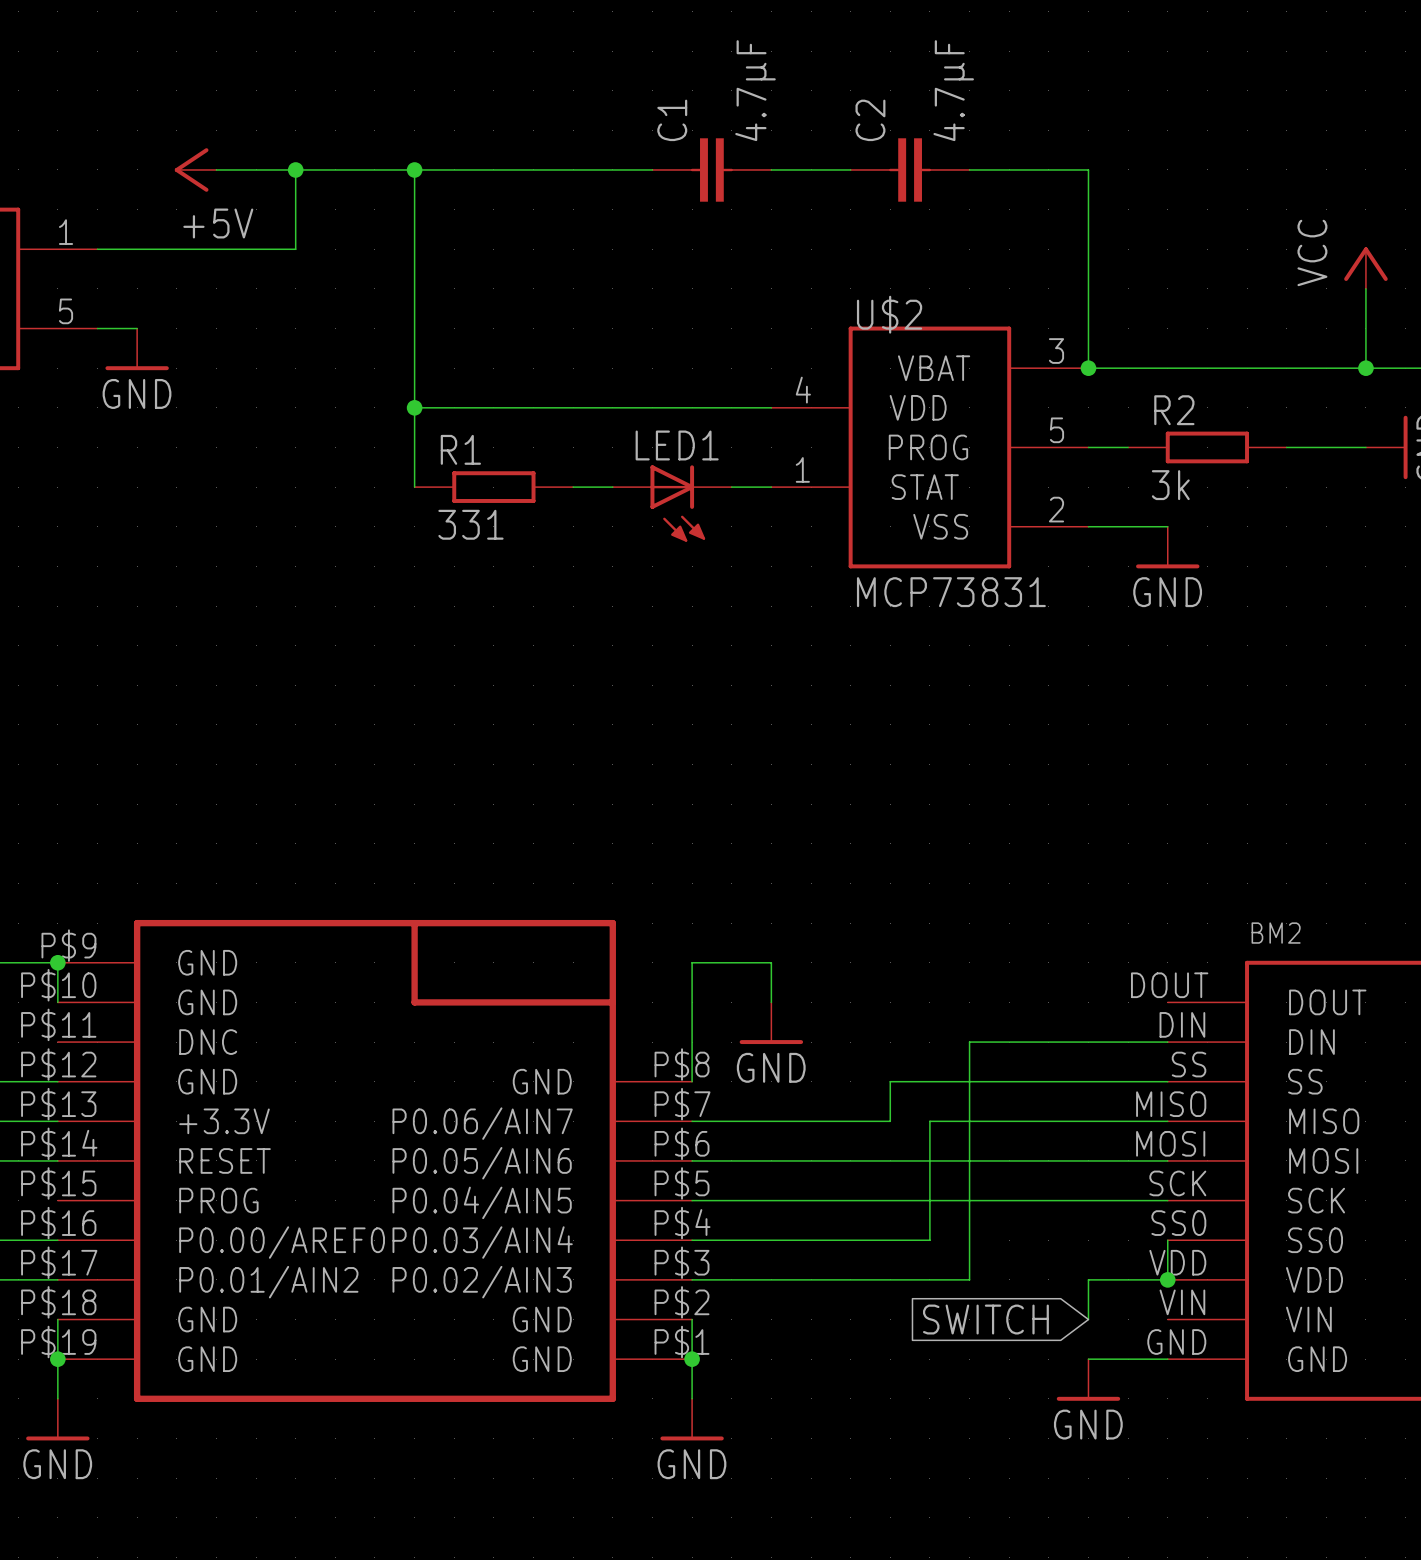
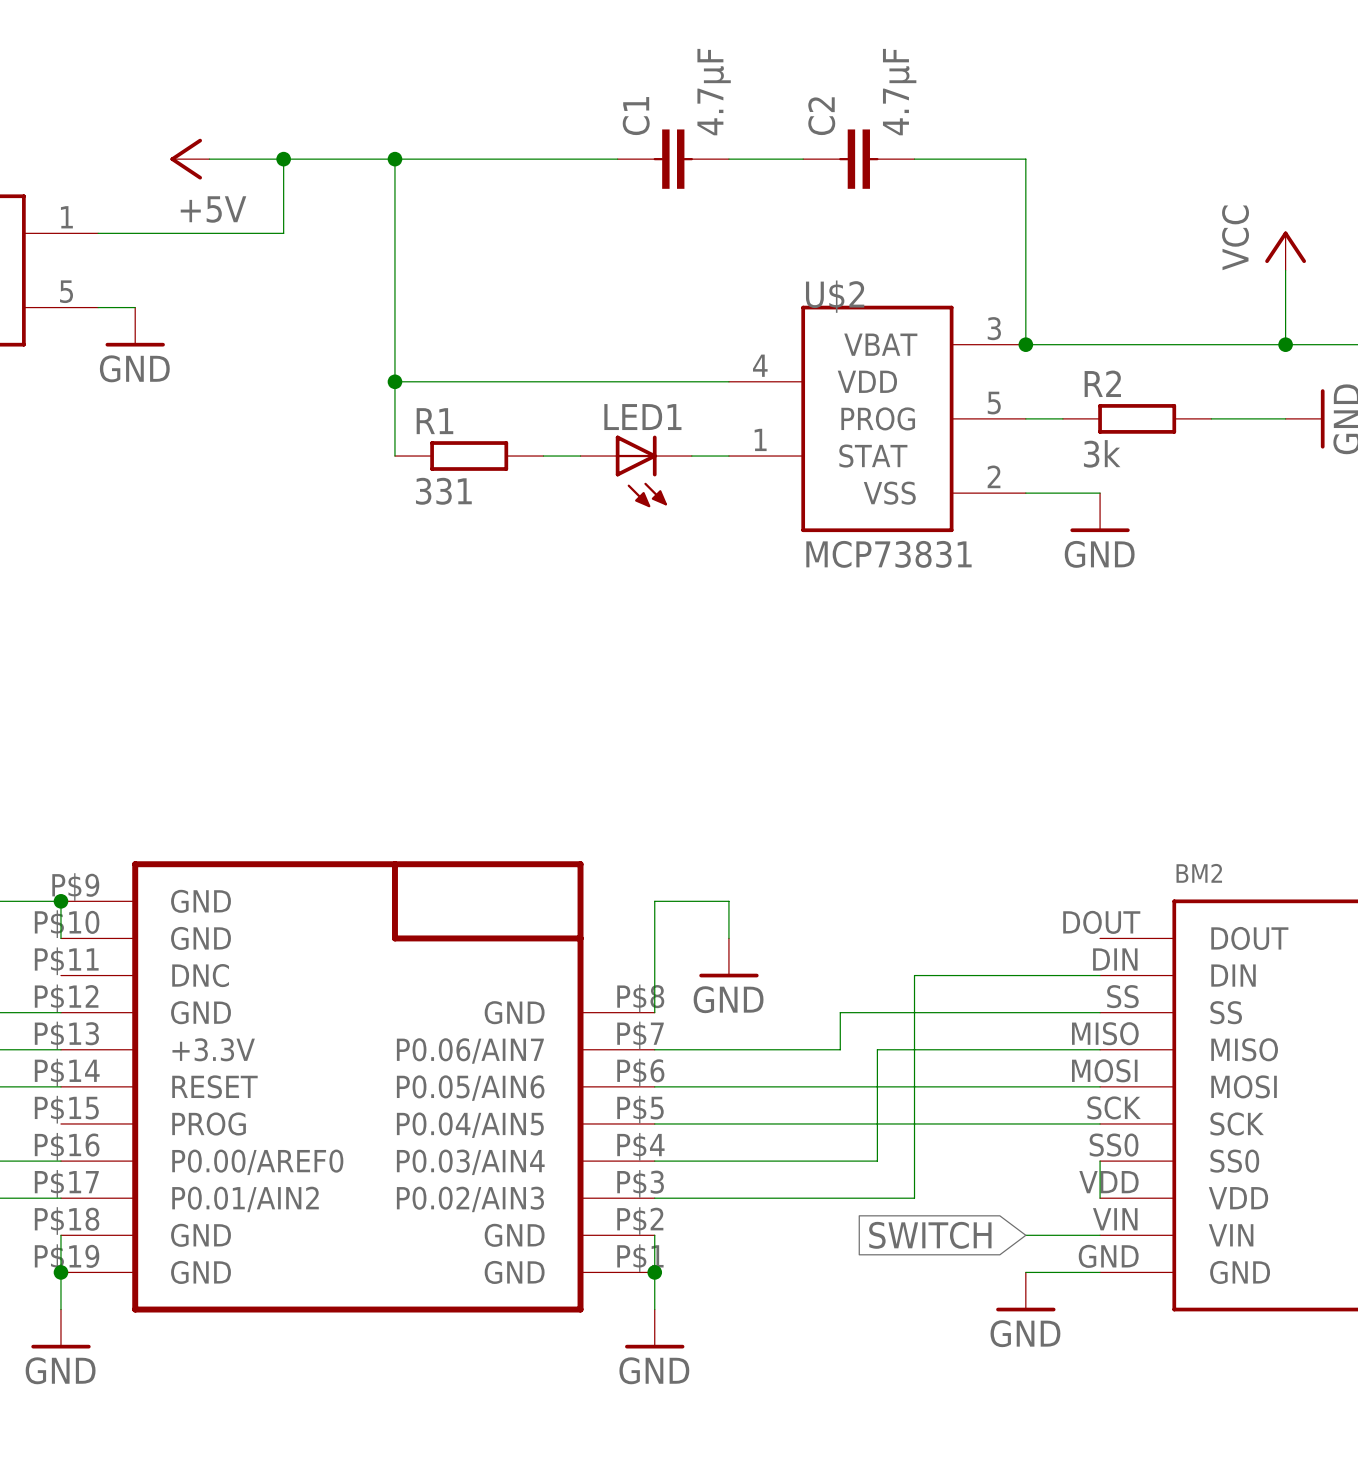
wire: (1167, 1279) (1088, 1279) (1088, 1319) -> (1100, 1235) (1025, 1235)
junction: (1167, 1279) -> none

